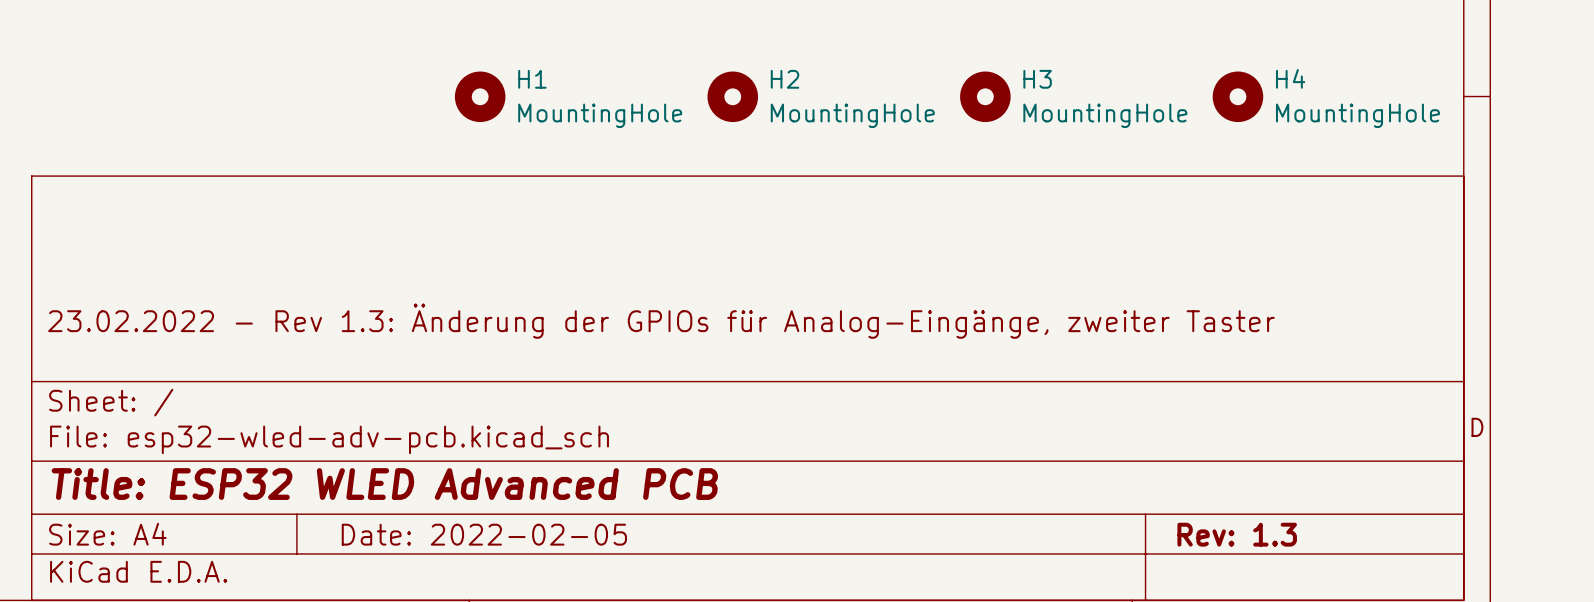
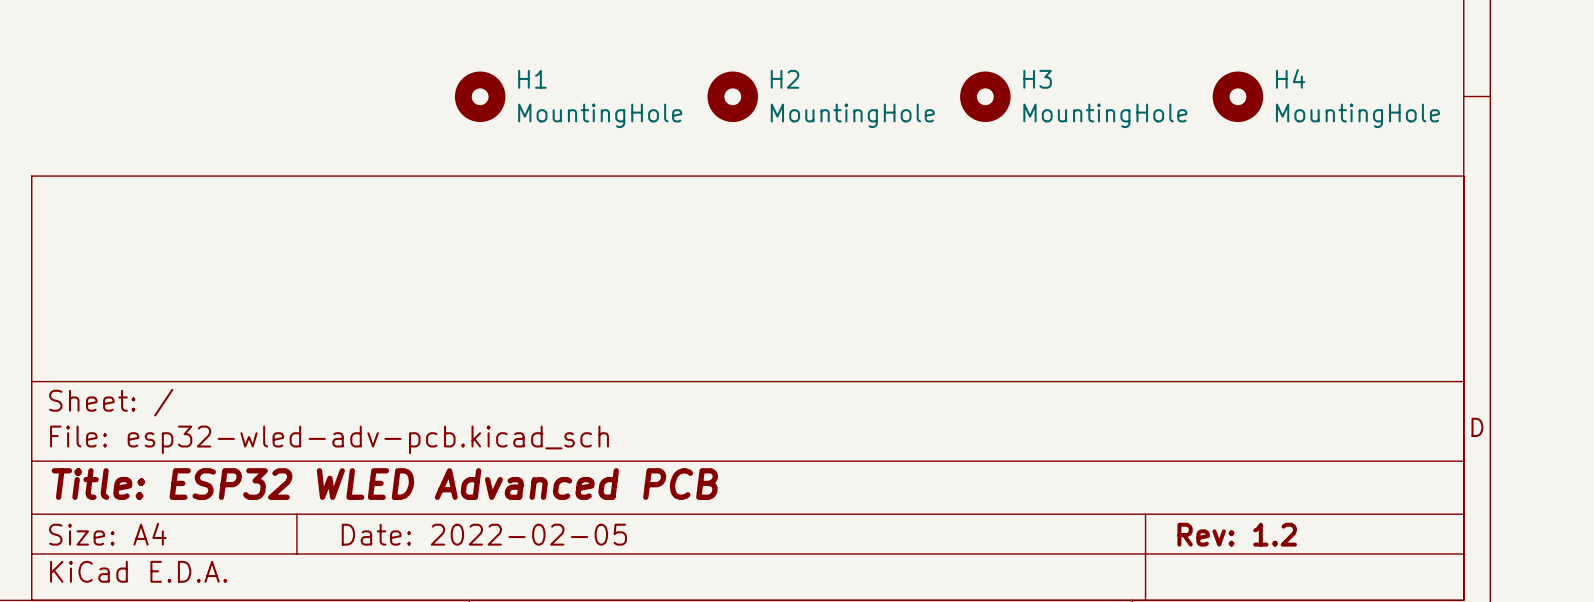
title block: 23.02.2022 - Rev 1.3: Änderung der GPIOs für Analog-Eingänge, zweiter Taster (661, 321) -> none
title block: Rev: 1.3 (1237, 534) -> Rev: 1.2 (1237, 534)

